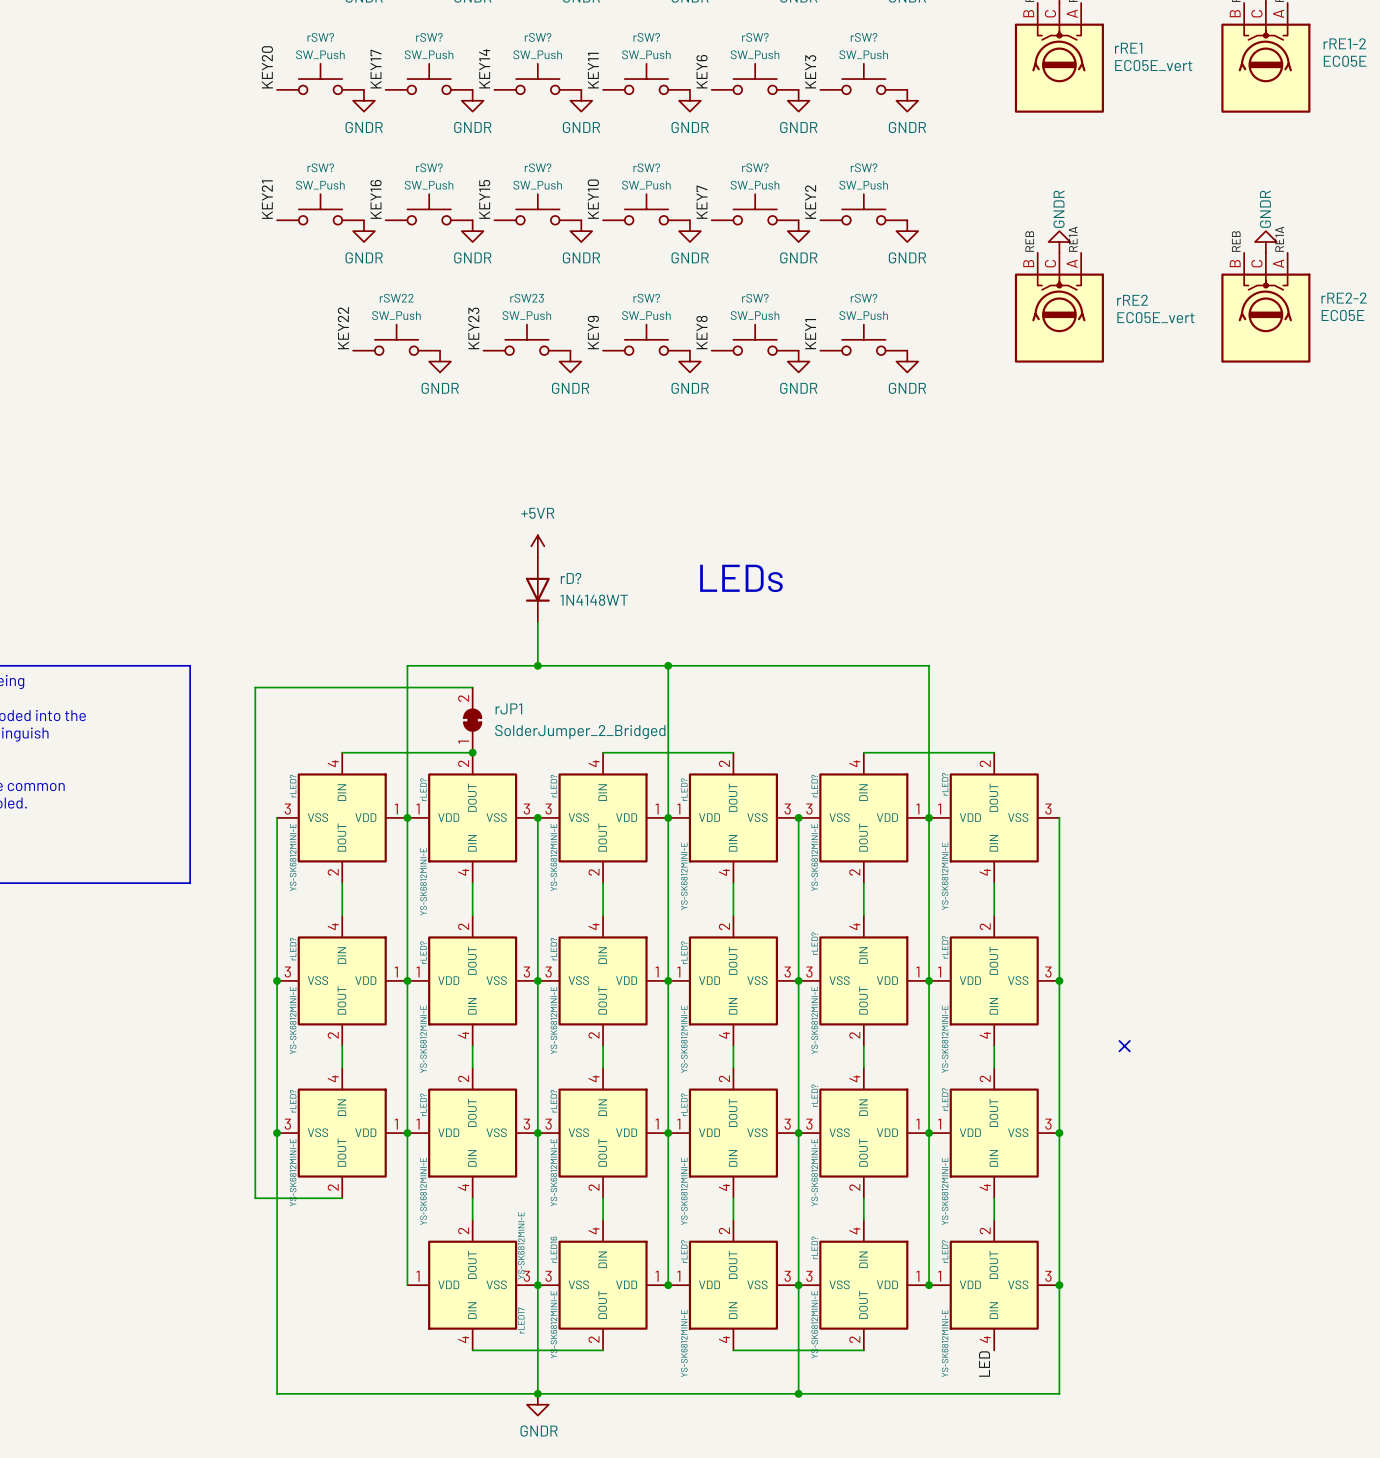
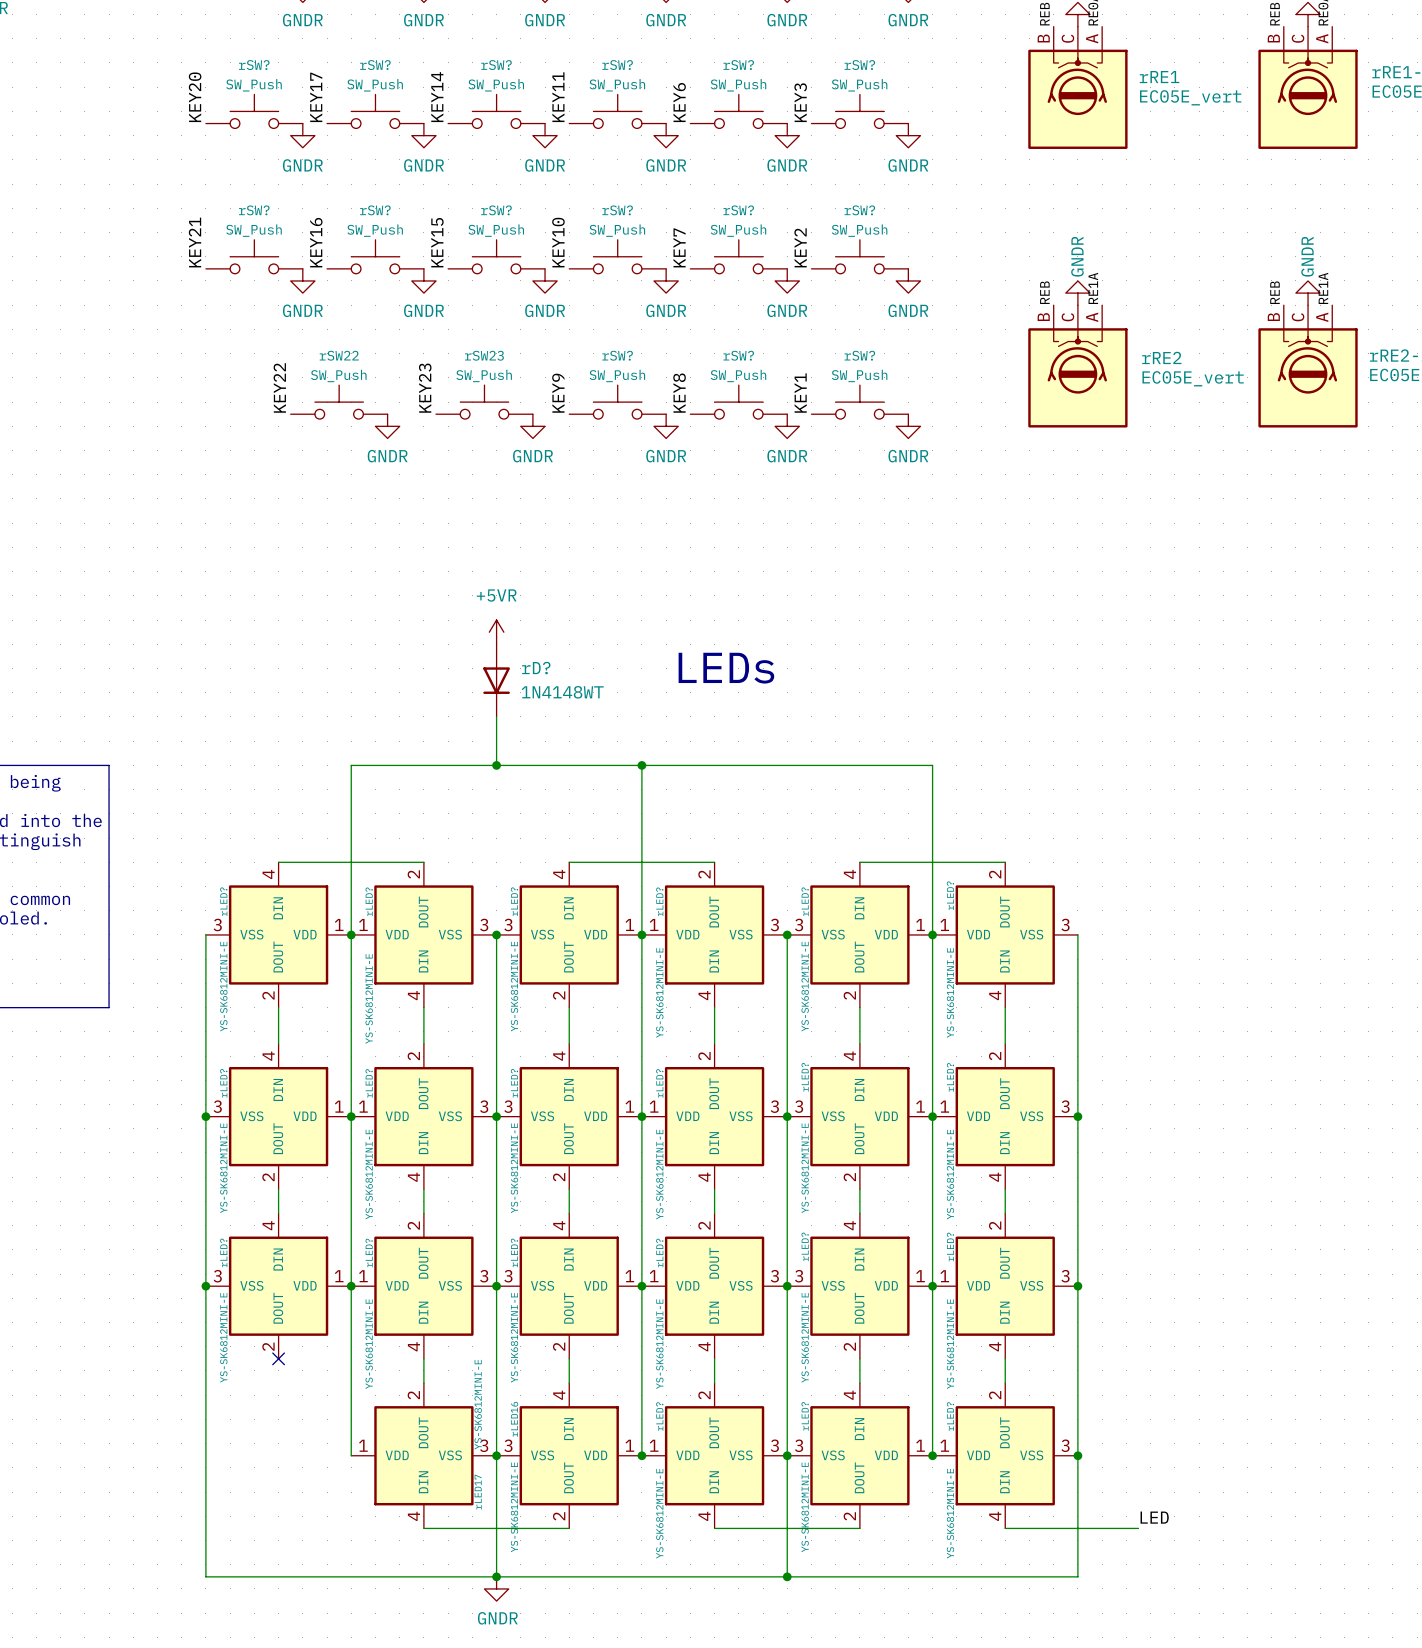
wire: (472, 687) (255, 687) (255, 1198) (342, 1198) -> none
rJP1: SolderJumper_2_Bridged (472, 720) -> none
junction: (472, 752) -> none
no-connect mark: (1124, 1046) -> none
no-connect mark: none -> (278, 1358)
wire: none -> (1005, 1528) (1138, 1528)
label rotation: 0° (984, 1364) -> 90° clockwise (1154, 1517)
label position: LED (984, 1364) -> LED (1154, 1517)

